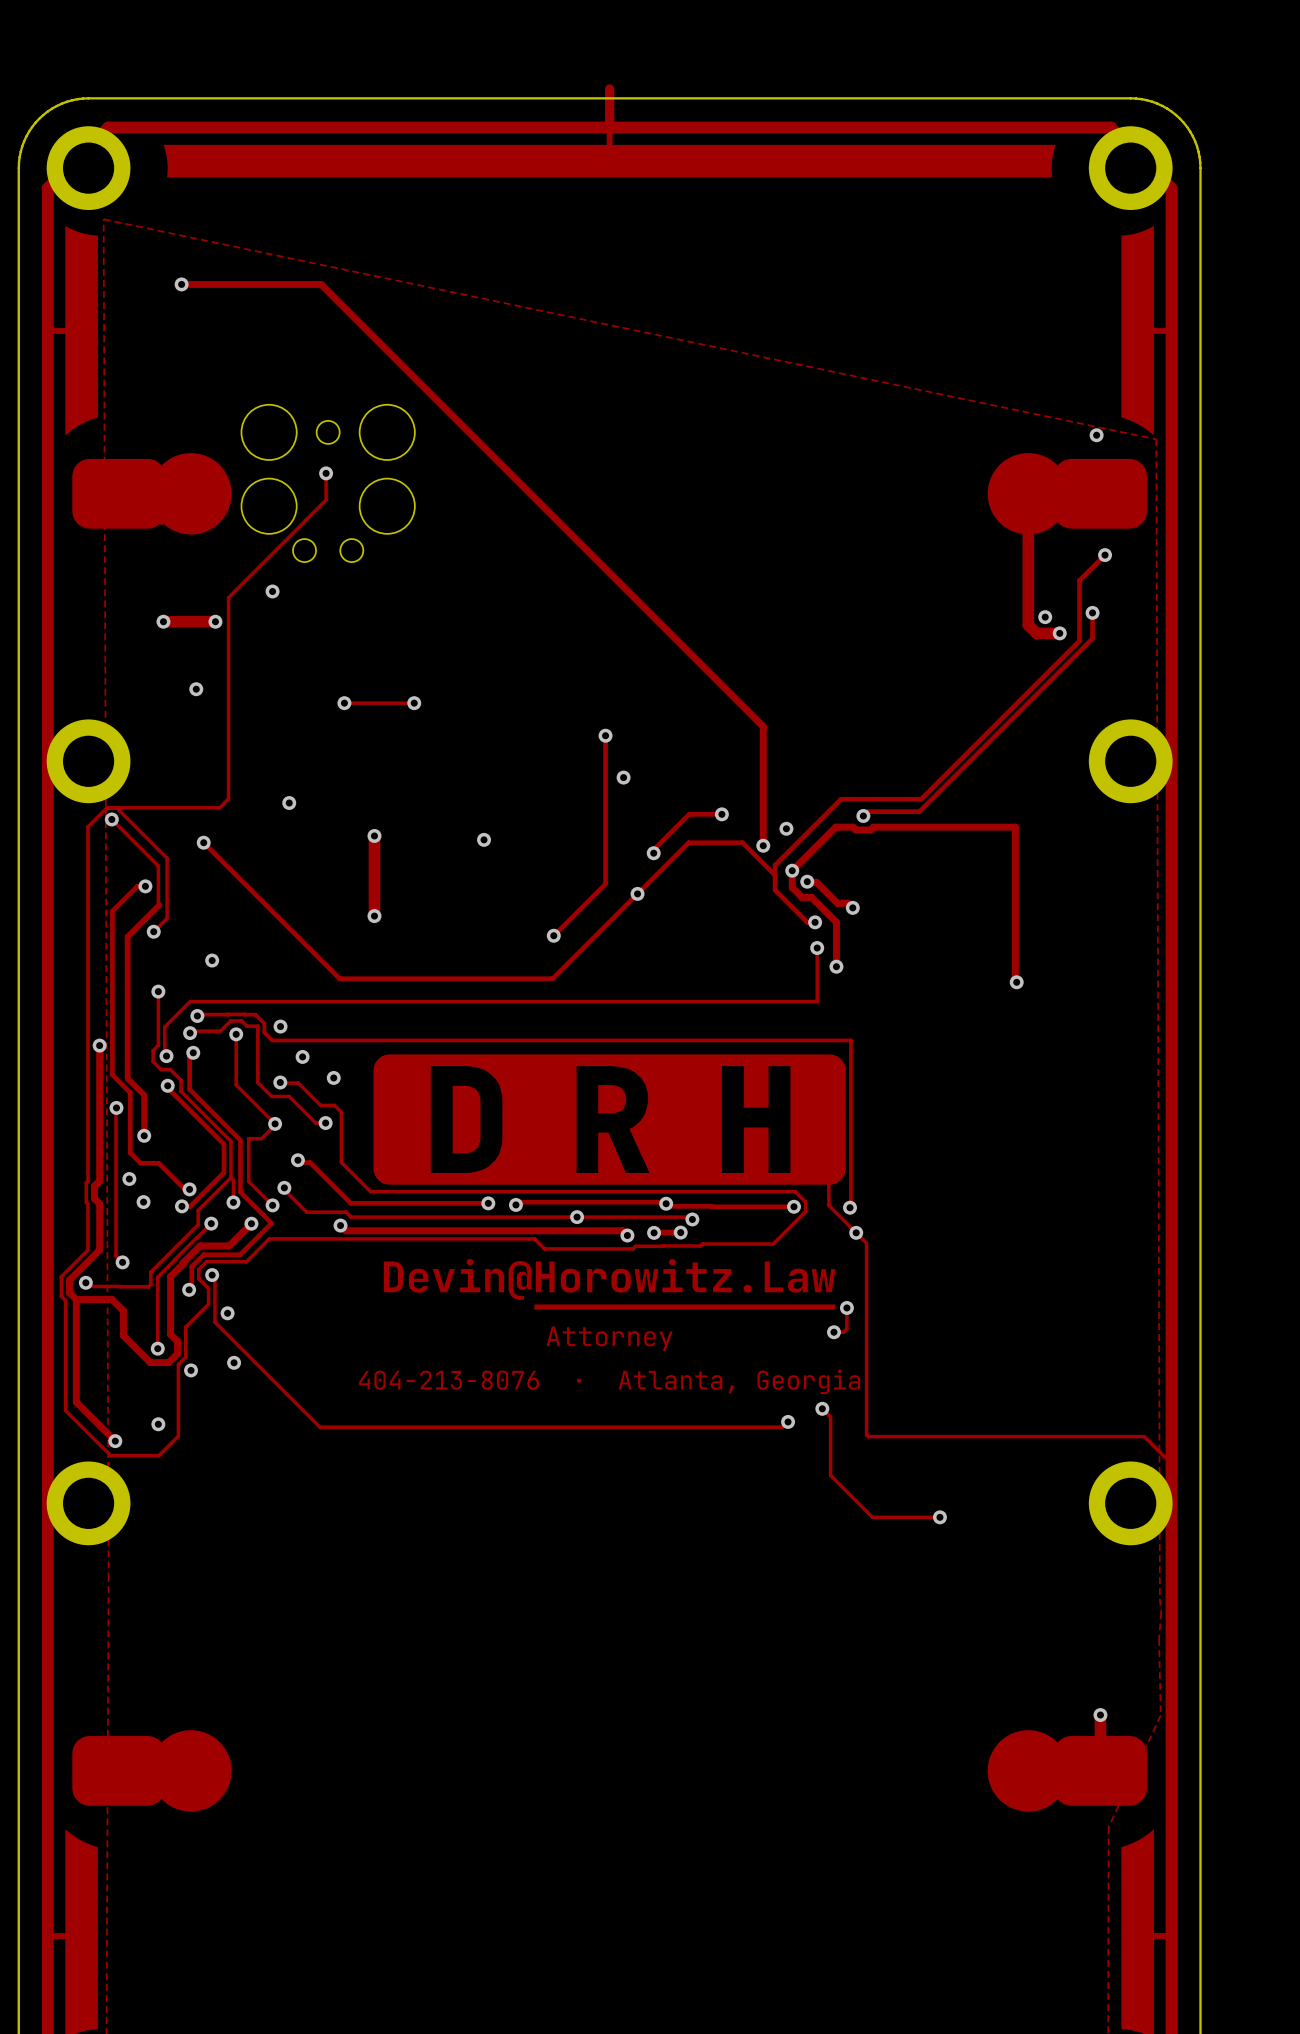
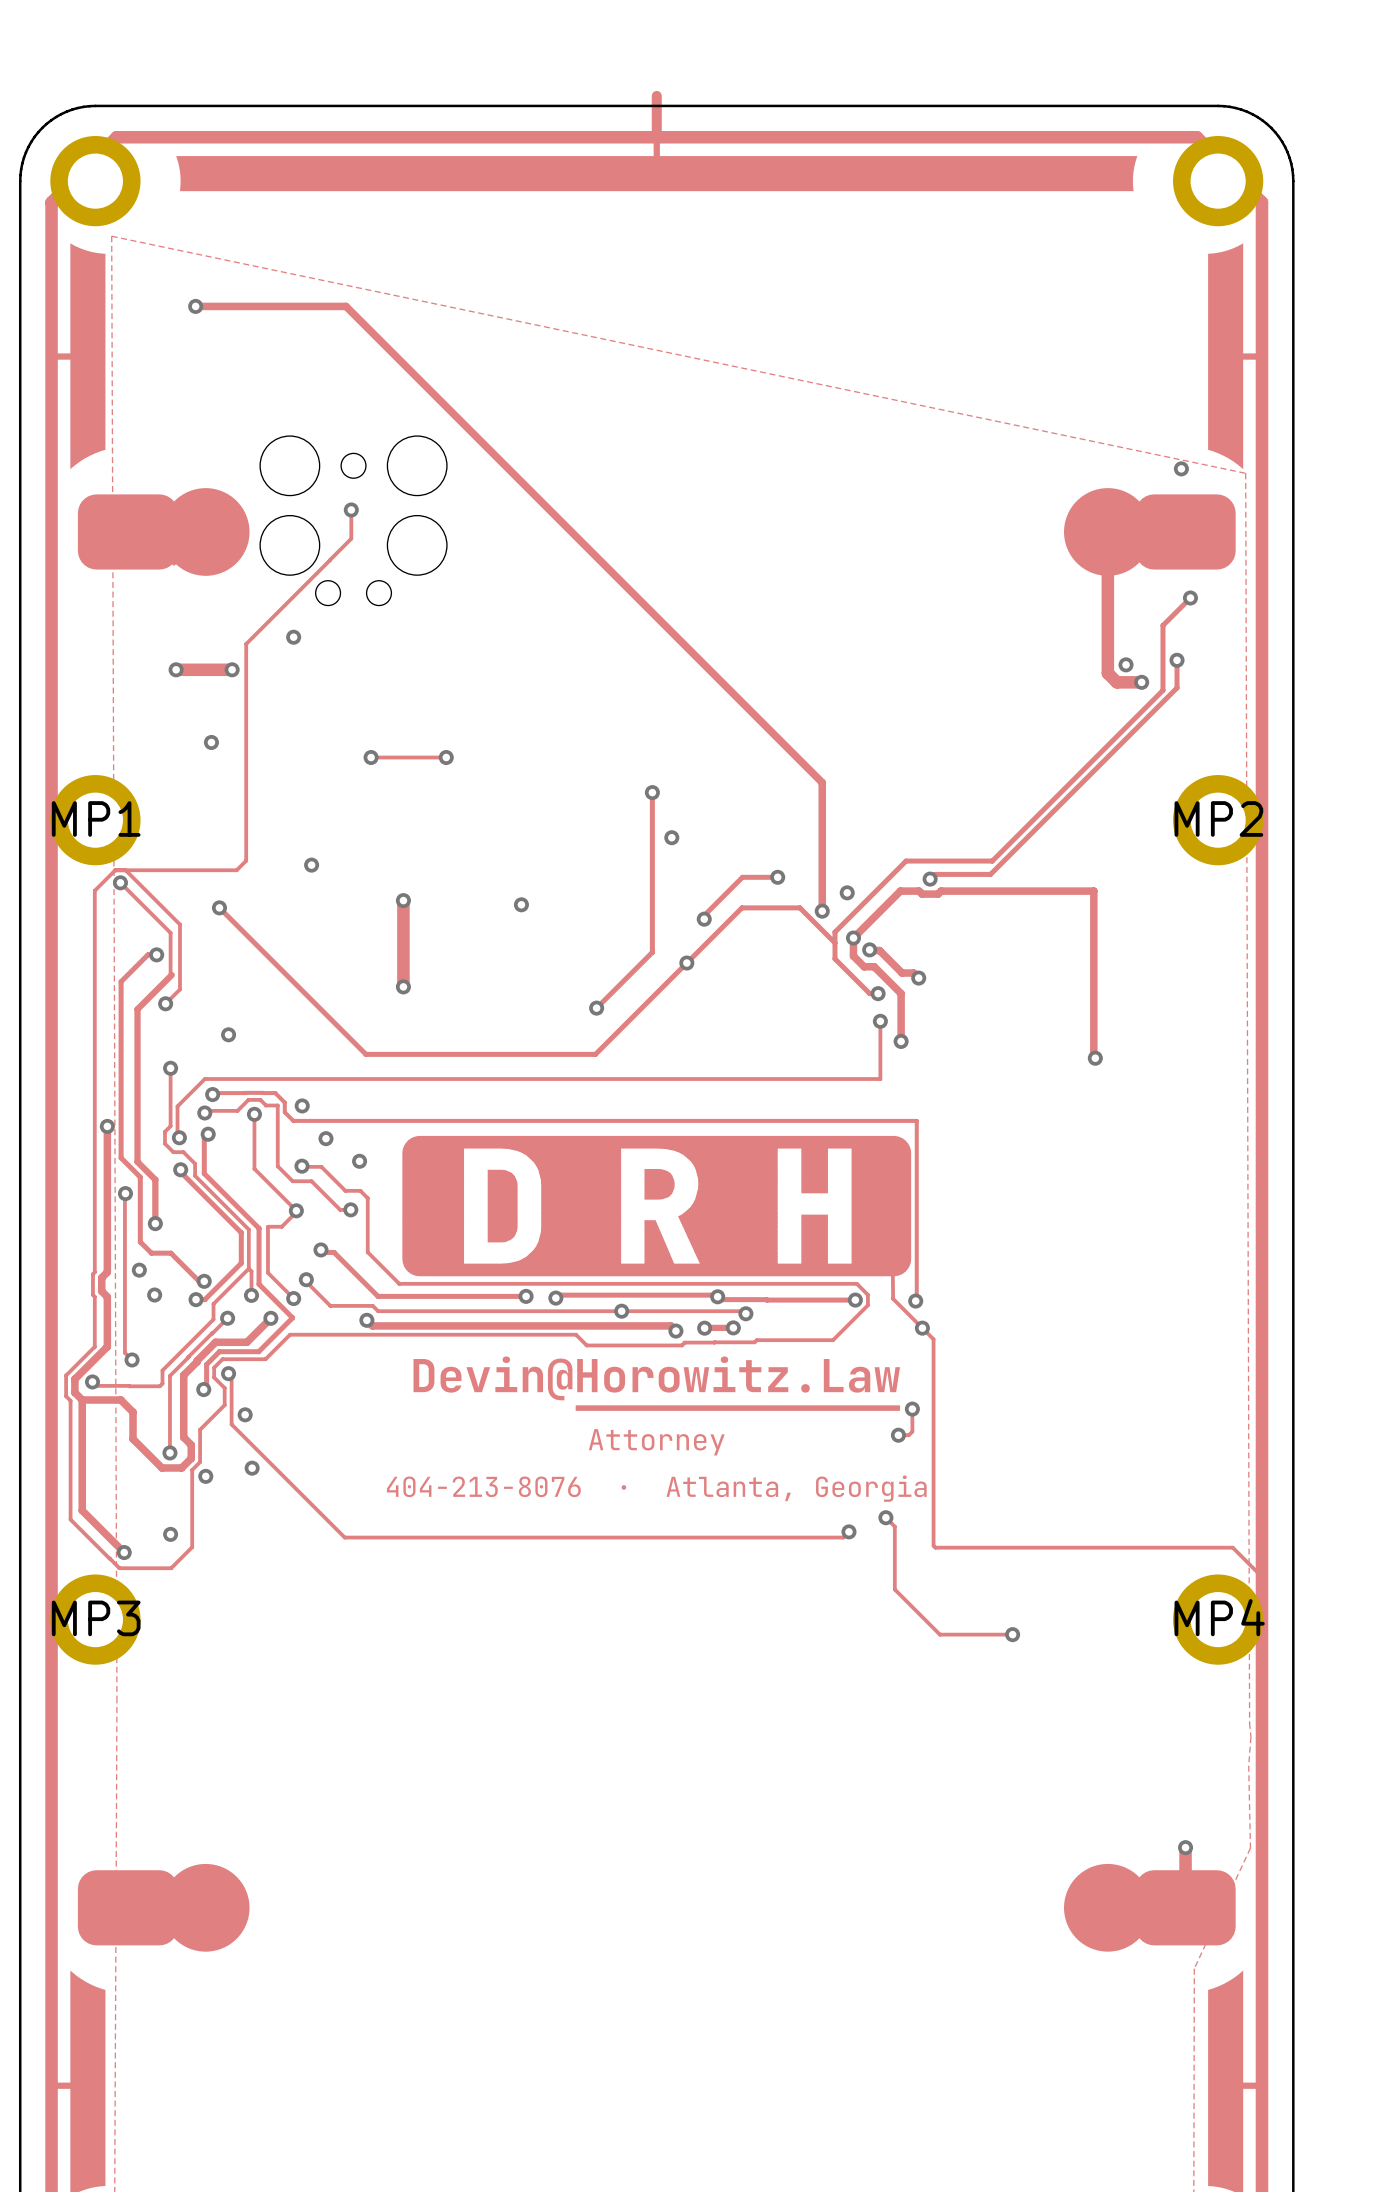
MP2 name: none -> MP2 (1218, 818)
MP1 name: none -> MP1 (96, 818)
MP3 name: none -> MP3 (96, 1618)
MP4 name: none -> MP4 (1219, 1617)

